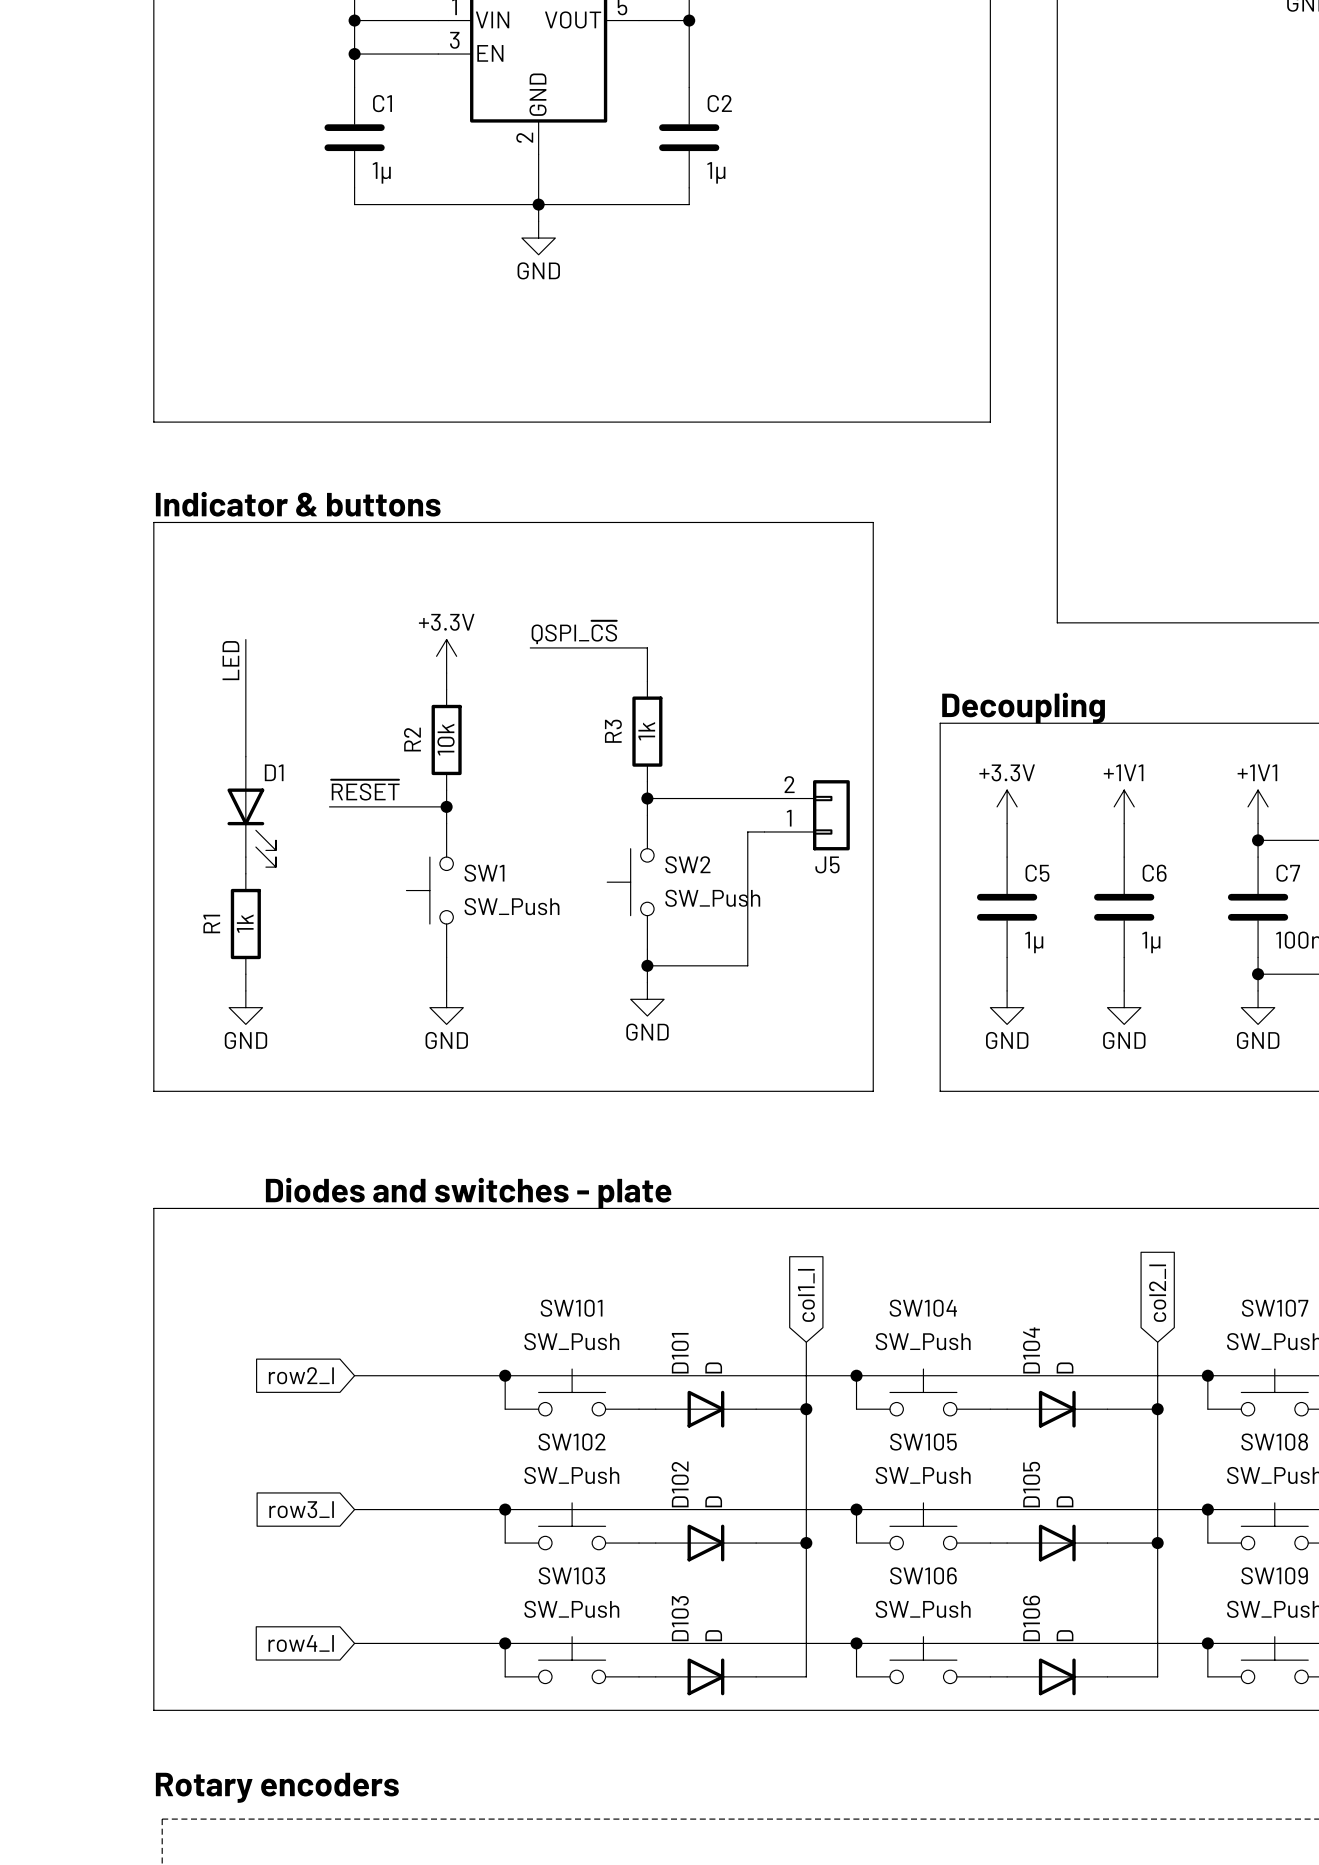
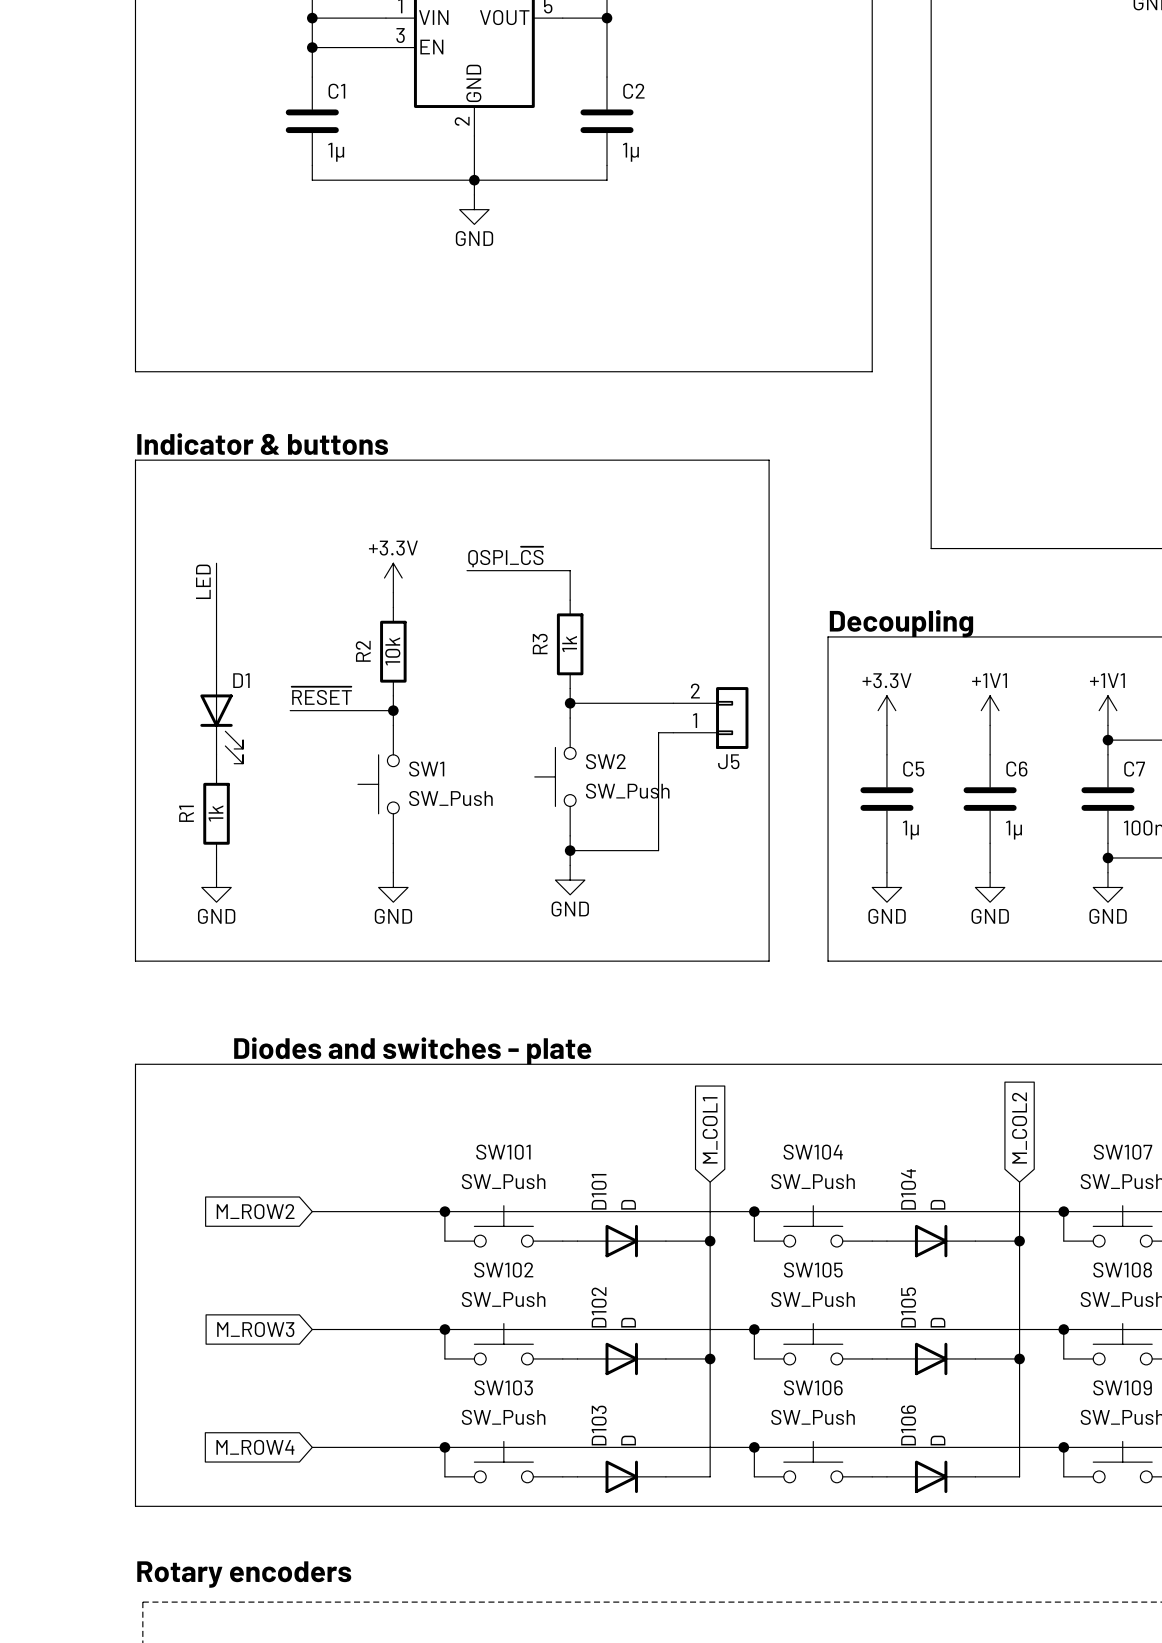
global label: col2_l (1157, 1293) -> M_COL2 (1019, 1128)
global label: col1_l (806, 1295) -> M_COL1 (710, 1130)
global label: row2_l (301, 1375) -> M_ROW2 (255, 1211)
global label: row3_l (301, 1509) -> M_ROW3 (255, 1329)
global label: row4_l (301, 1643) -> M_ROW4 (255, 1447)

